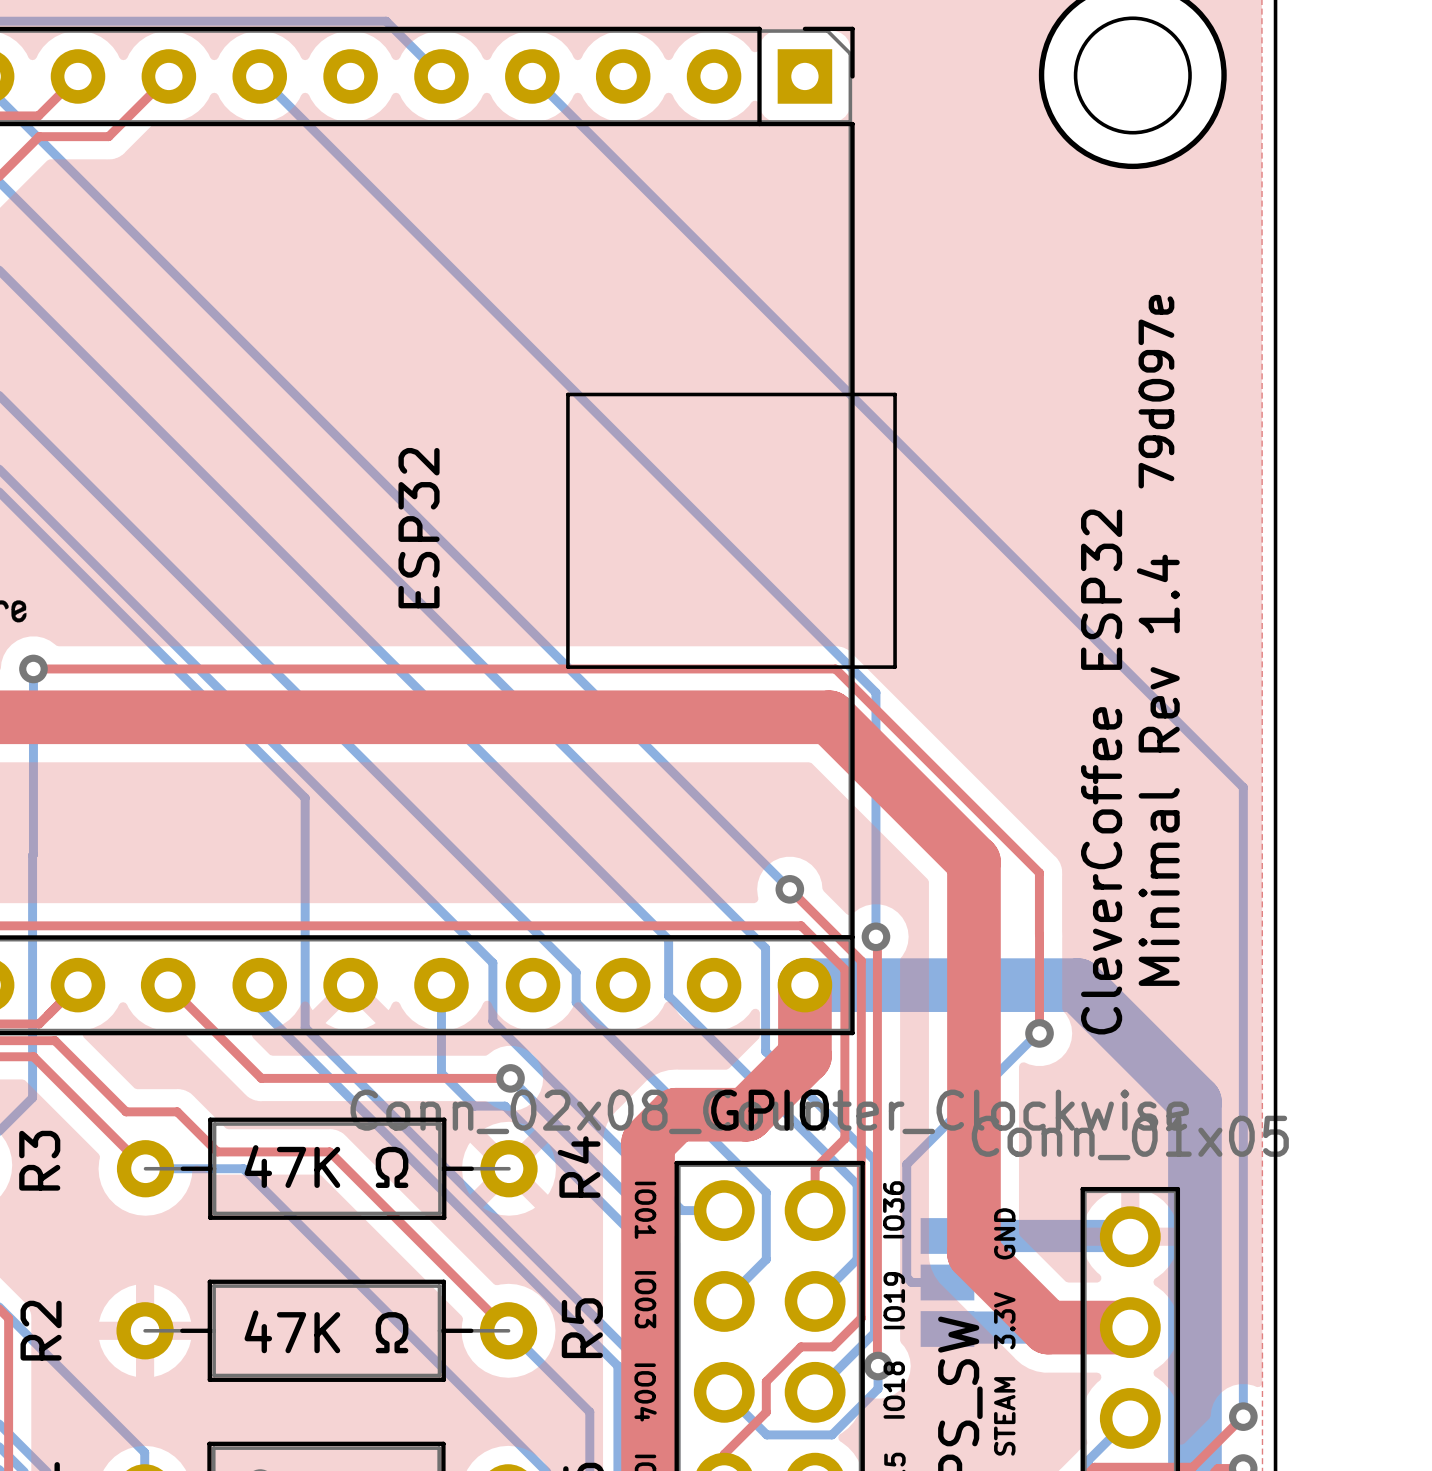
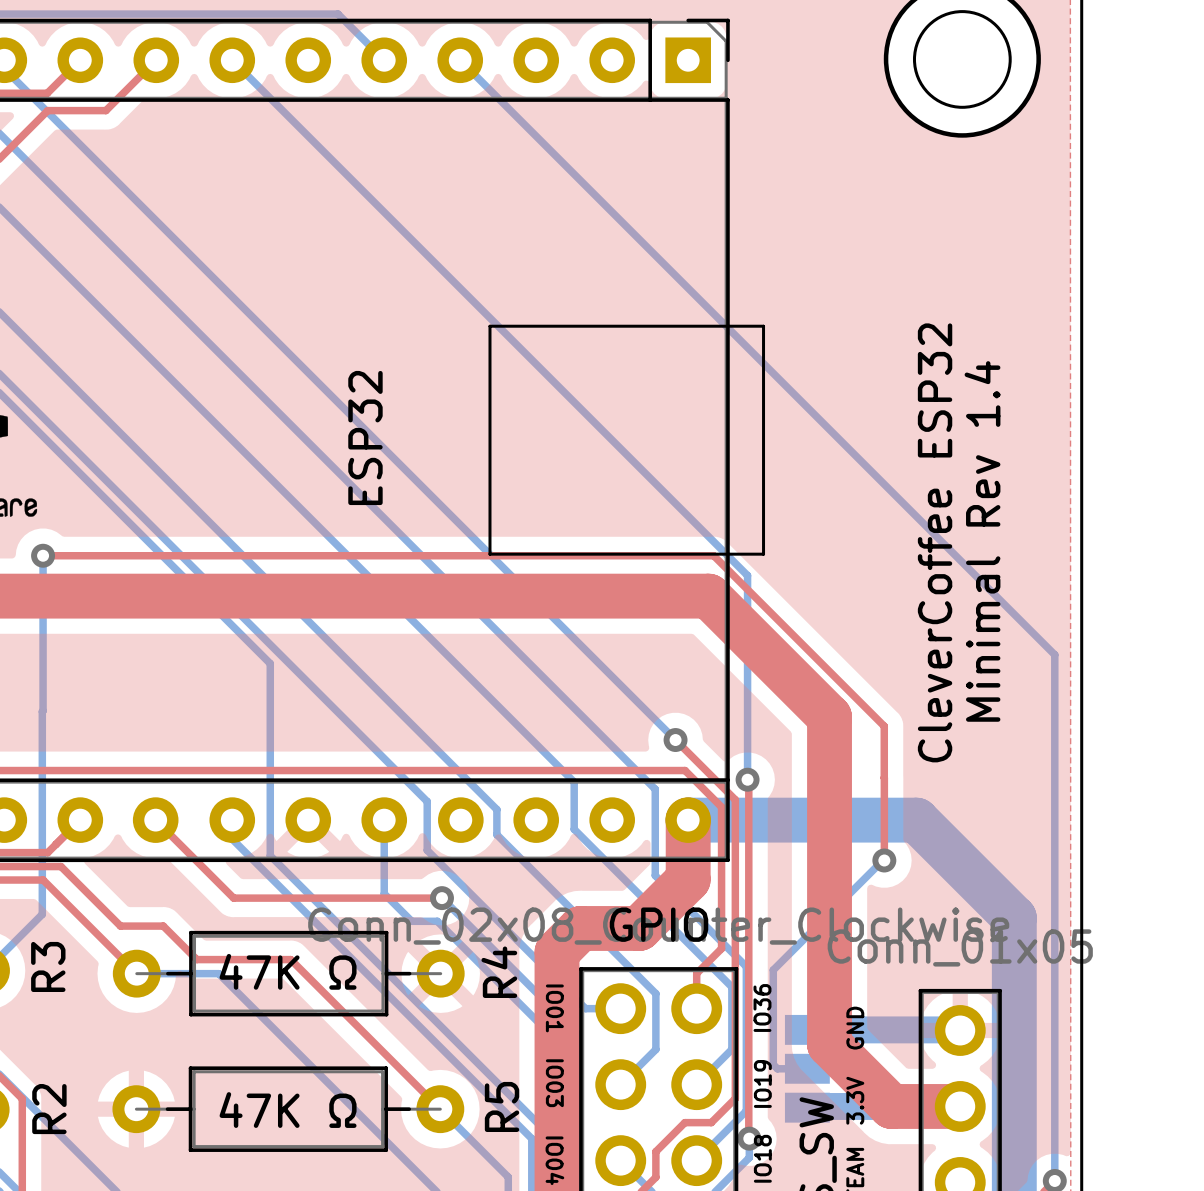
text: 79d097e (1156, 391) -> none
text position: Minimal Rev 1.4 (1158, 770) -> Minimal Rev 1.4 (982, 541)
text position: CleverCoffee ESP32 (1101, 772) -> CleverCoffee ESP32 (935, 542)

